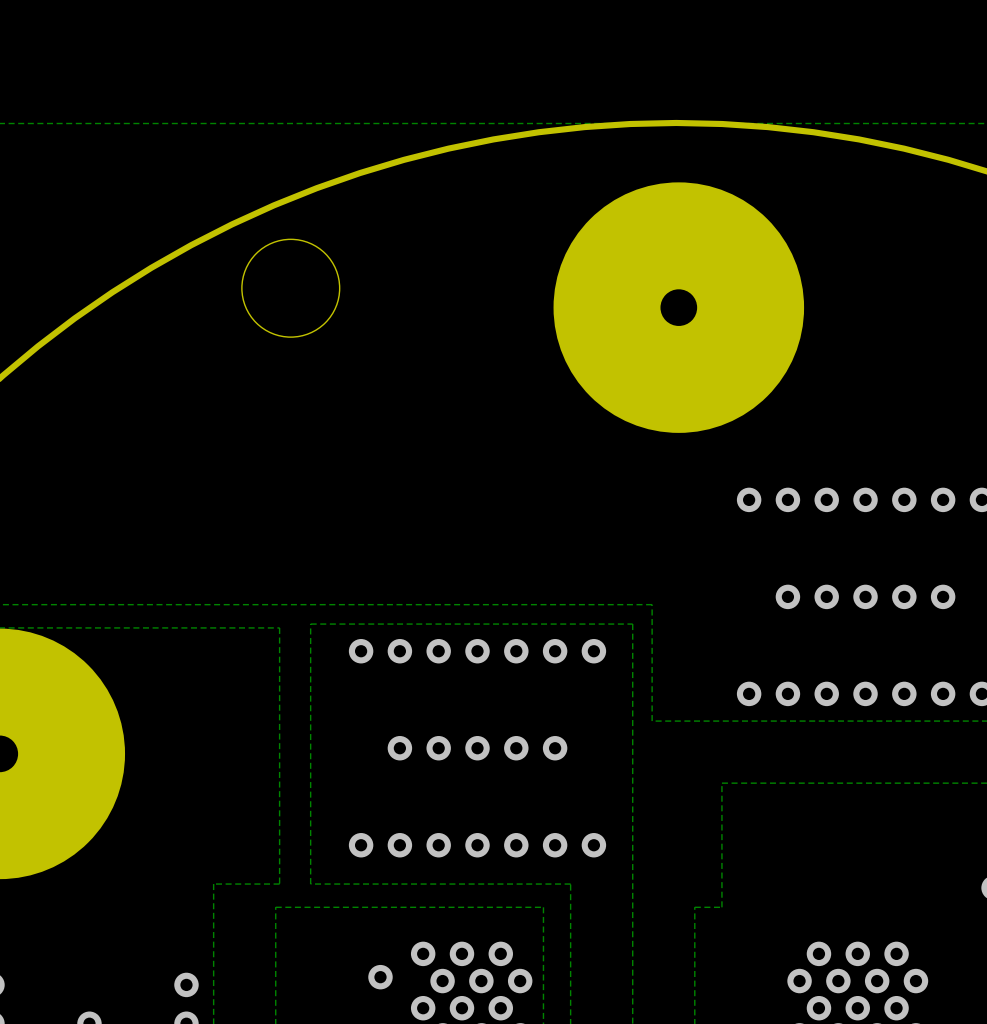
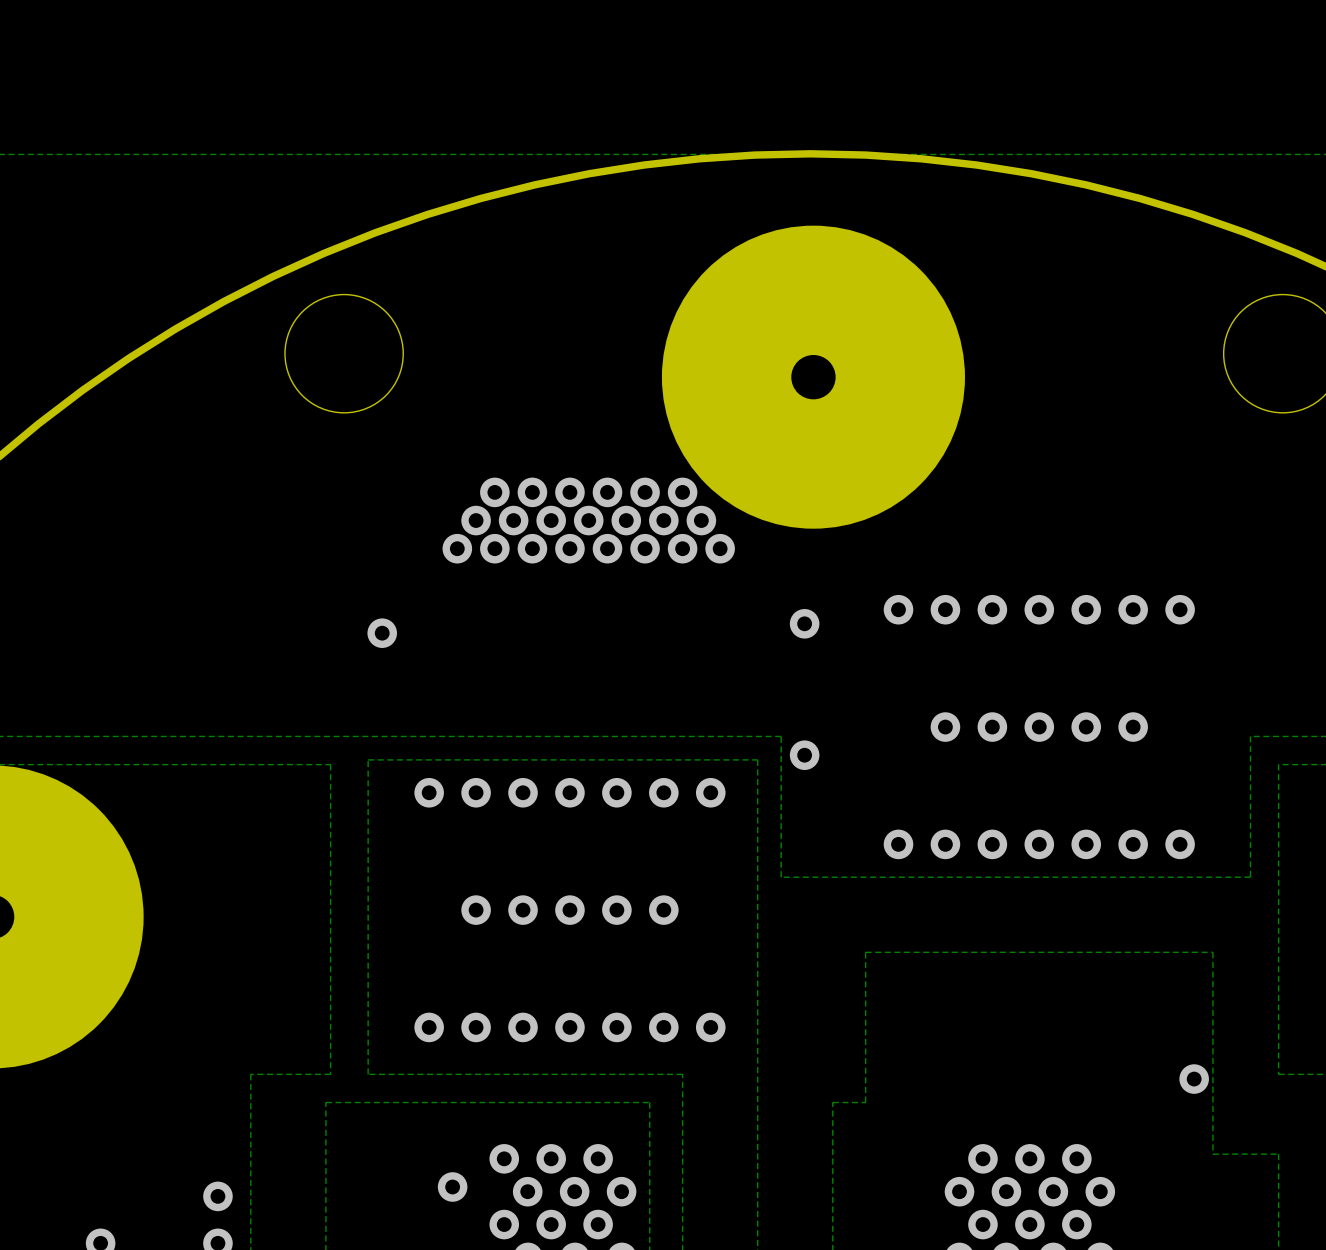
via: none -> (494, 492)
via: none -> (532, 492)
via: none -> (569, 492)
via: none -> (607, 492)
via: none -> (645, 492)
via: none -> (682, 492)
via: none -> (476, 520)
via: none -> (513, 520)
via: none -> (551, 520)
via: none -> (588, 520)
via: none -> (626, 520)
via: none -> (663, 520)
via: none -> (701, 520)
via: none -> (457, 548)
via: none -> (494, 548)
via: none -> (532, 548)
via: none -> (569, 548)
via: none -> (607, 548)
via: none -> (645, 548)
via: none -> (682, 548)
via: none -> (720, 548)
via: none -> (804, 623)
via: none -> (382, 633)
via: none -> (804, 755)

